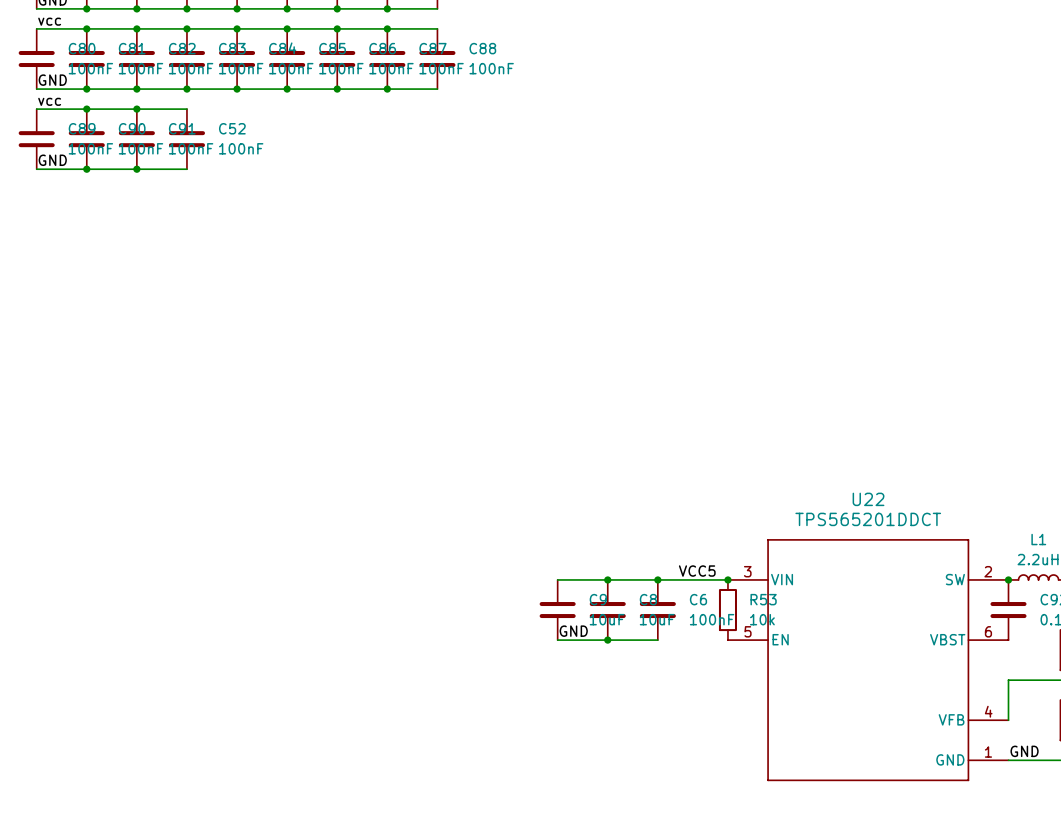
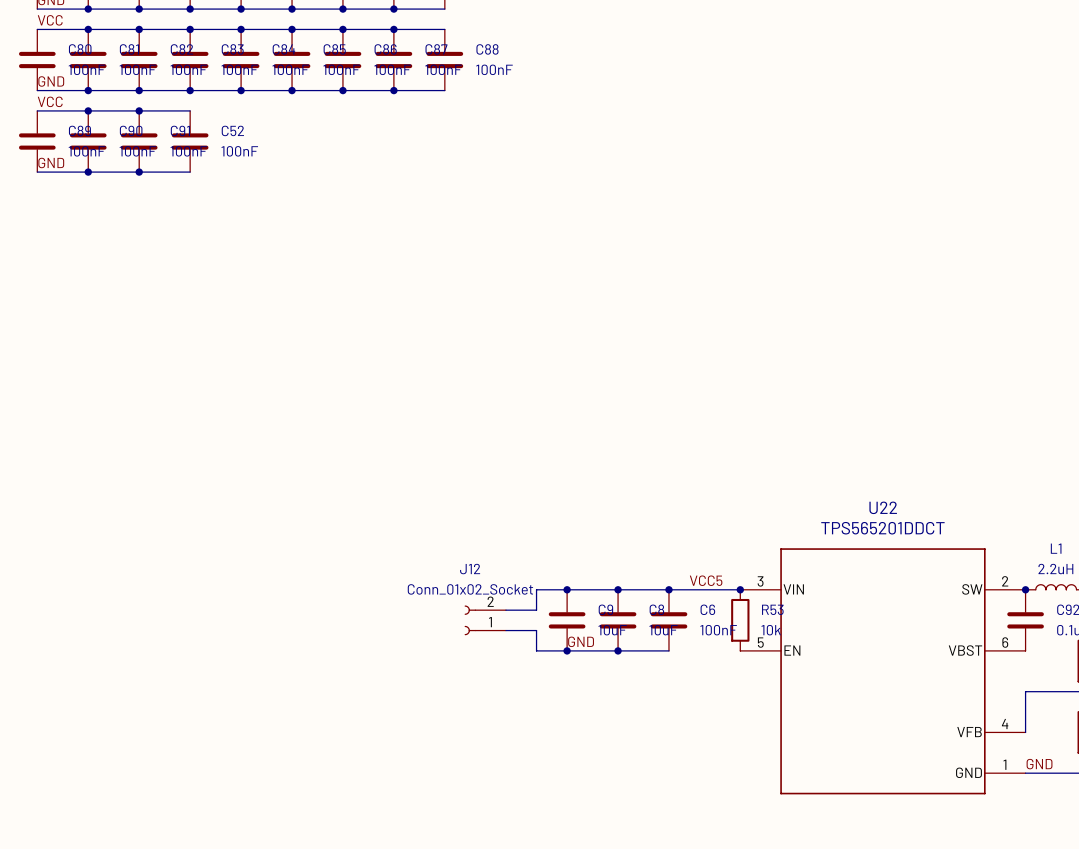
label: vcc (49, 21) -> VCC (50, 20)
label: vcc (49, 101) -> VCC (50, 101)
wire: none -> (567, 589) (536, 589) (536, 610) (505, 610)
junction: none -> (567, 589)
J12: none -> Conn_01x02_Socket (485, 620)
wire: none -> (505, 630) (536, 630) (536, 650) (567, 650)
junction: none -> (567, 650)

